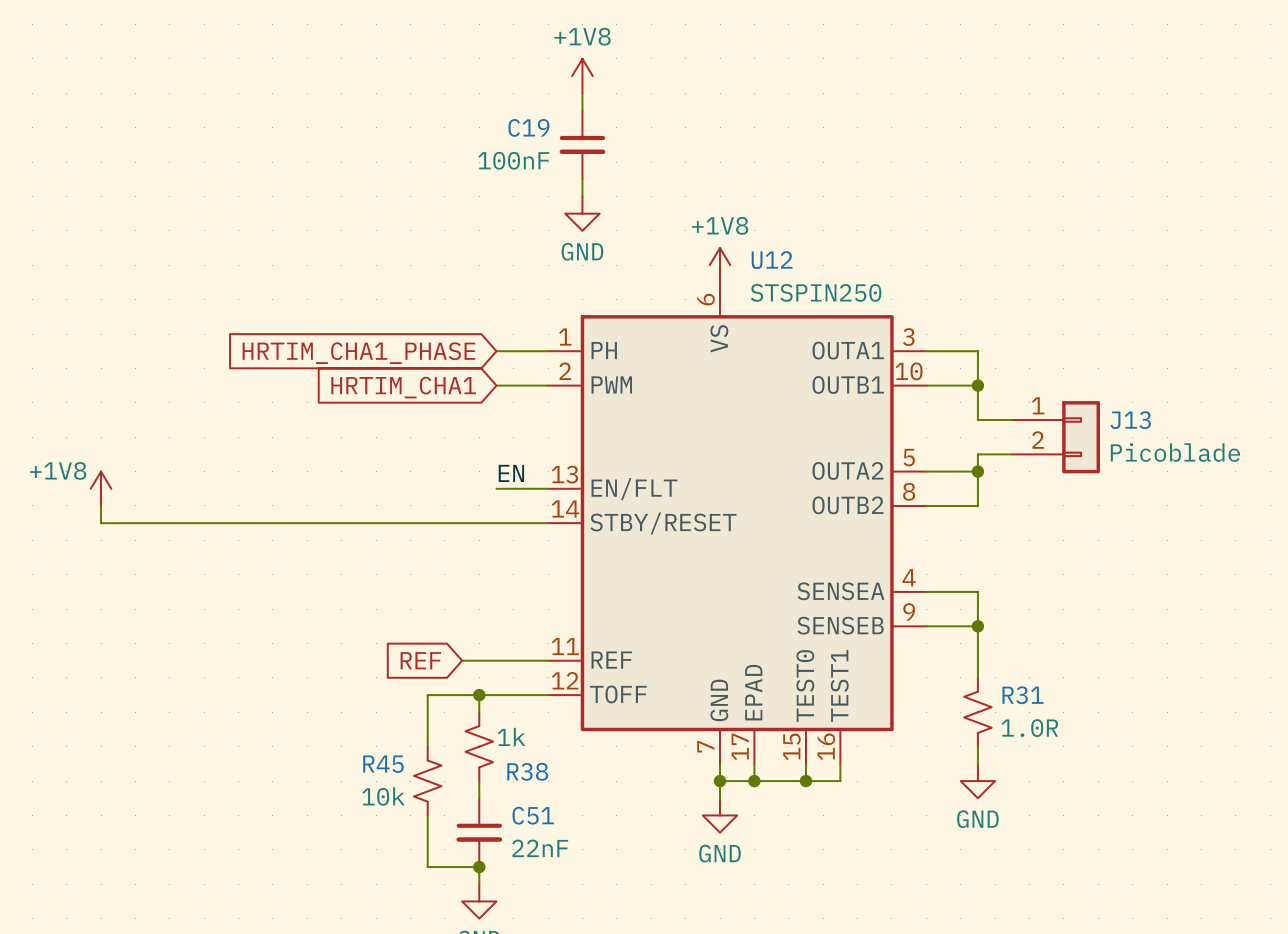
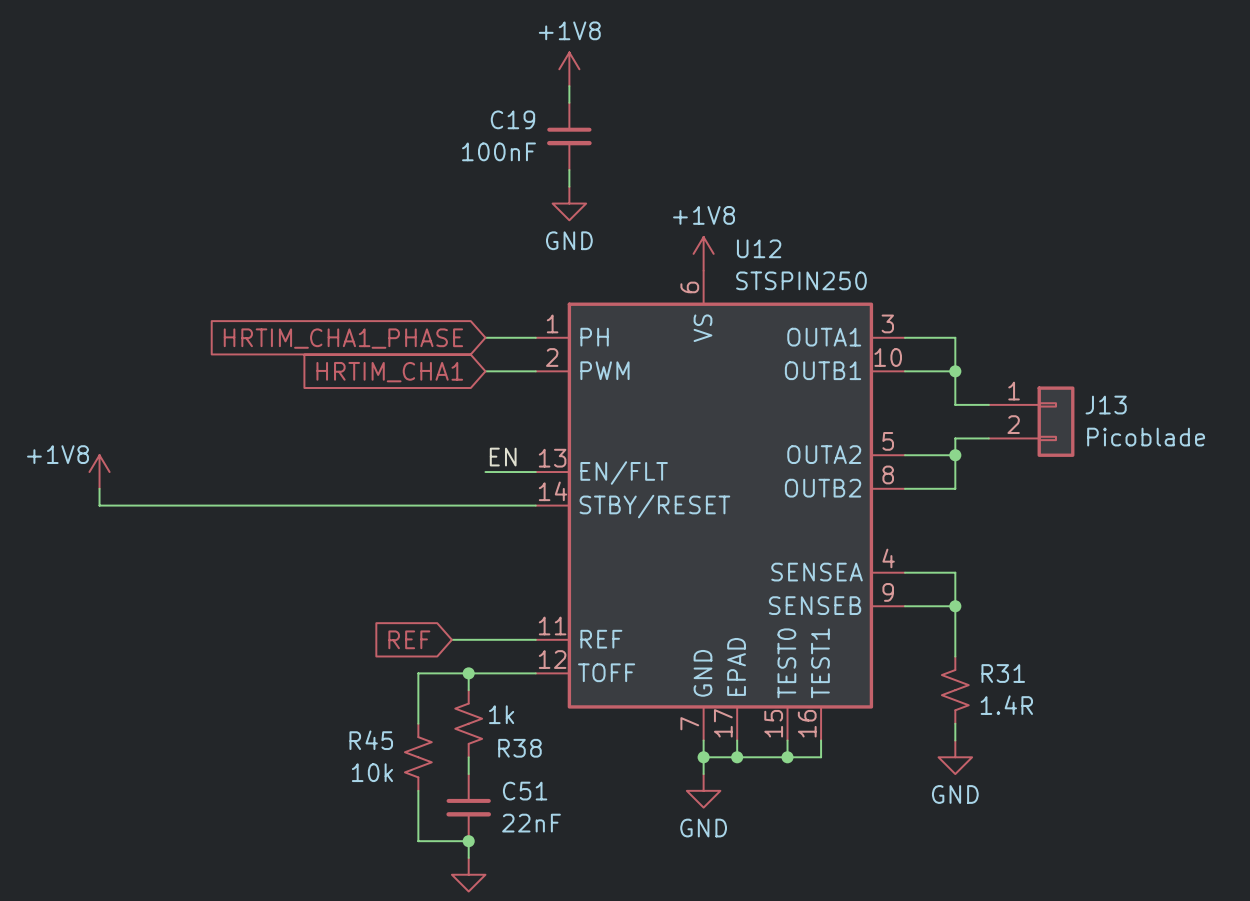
R31 value: 1.0R (1029, 728) -> 1.4R (1006, 705)

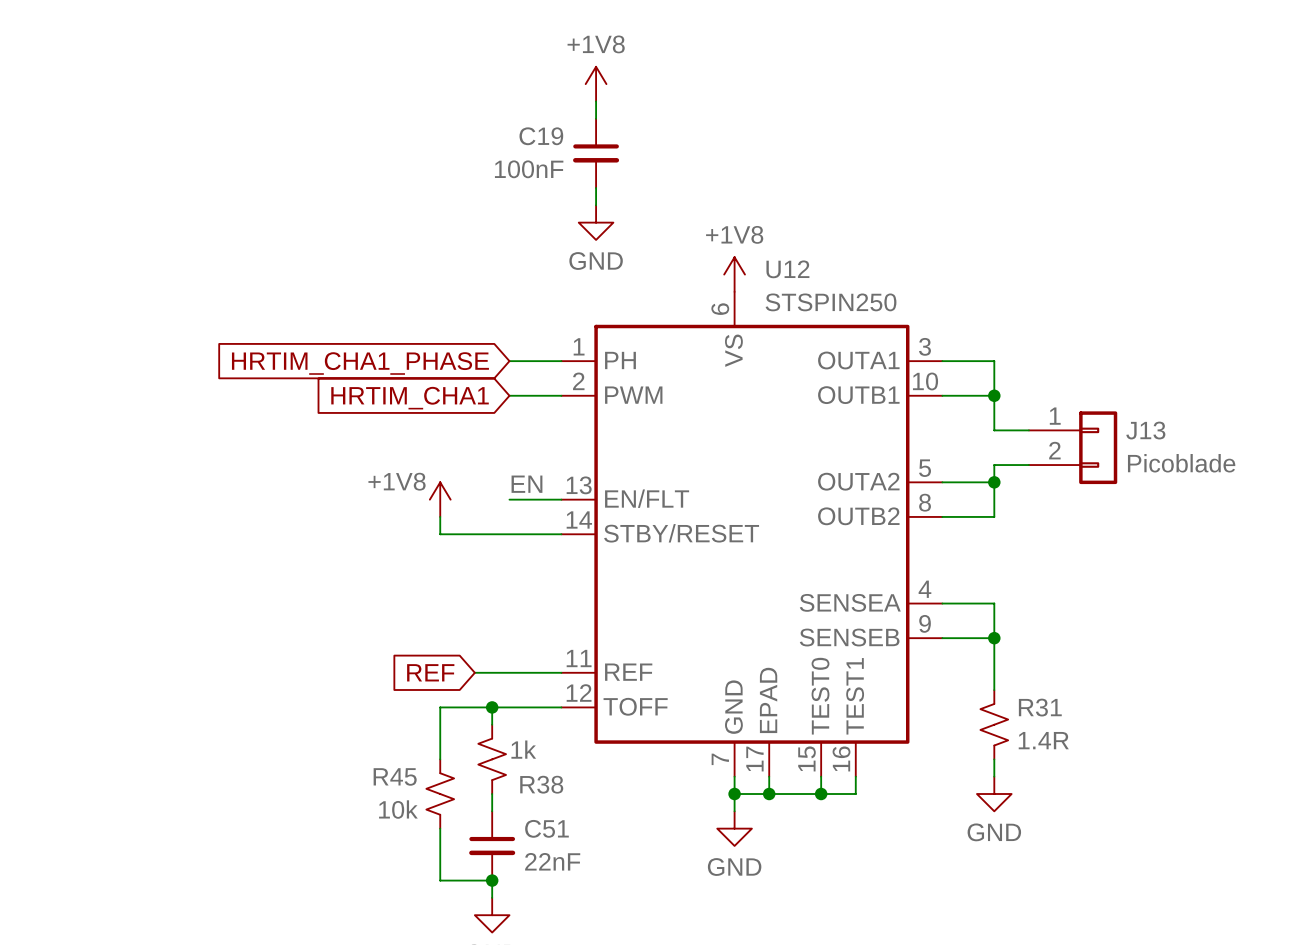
power symbol position: +1V8 (99, 472) -> +1V8 (440, 499)
wire: (99, 488) (99, 505) (418, 505) -> (440, 516) (440, 534)

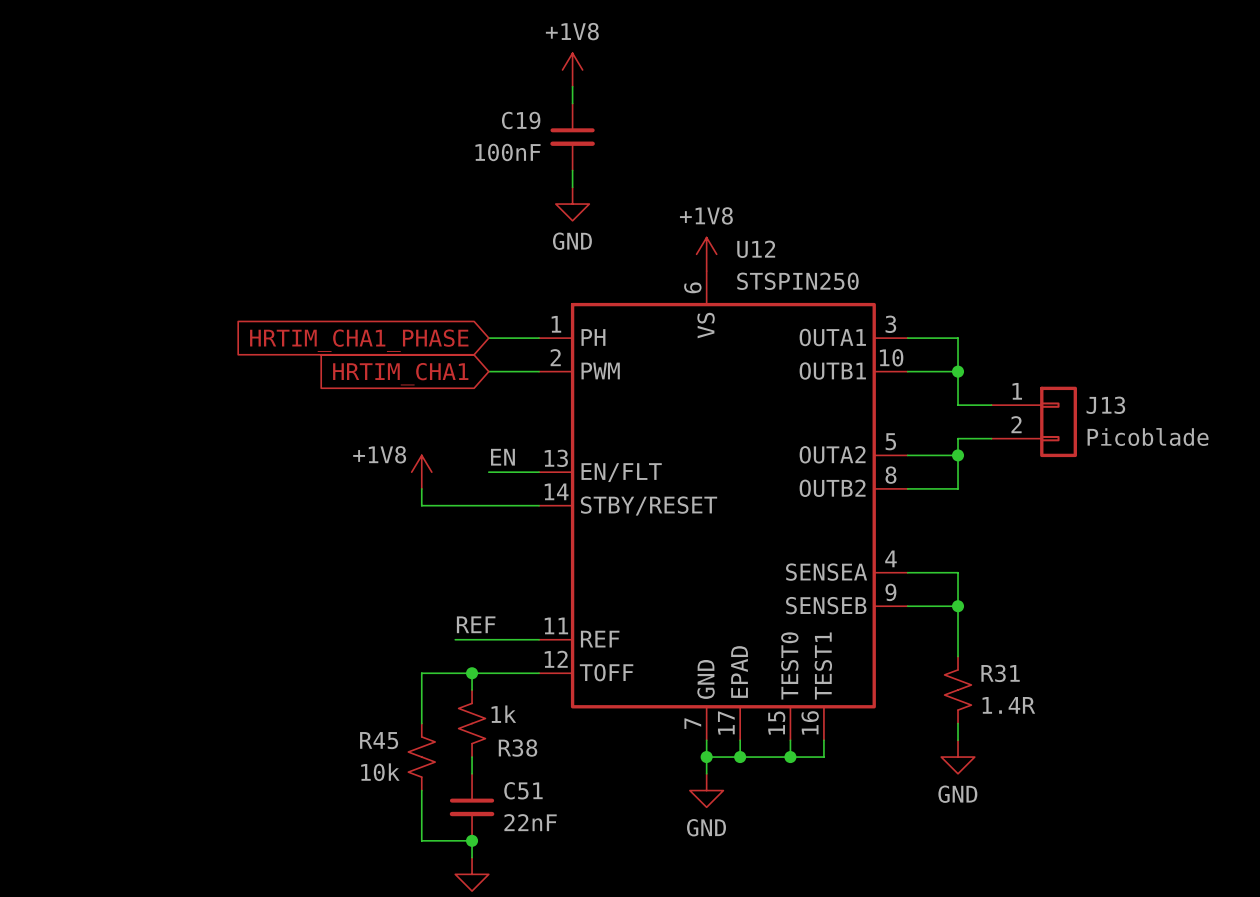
label: none -> REF (476, 624)
global label: REF (430, 672) -> none

